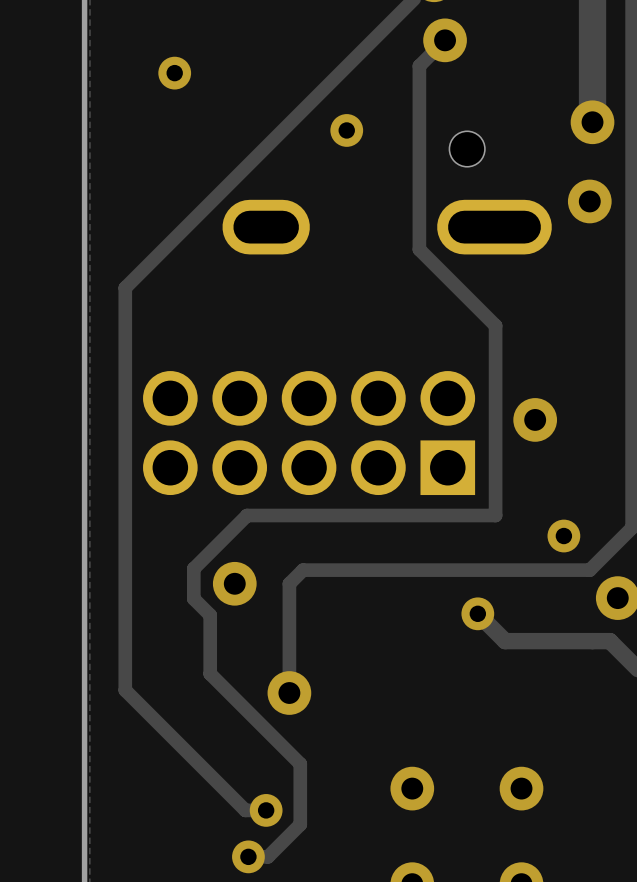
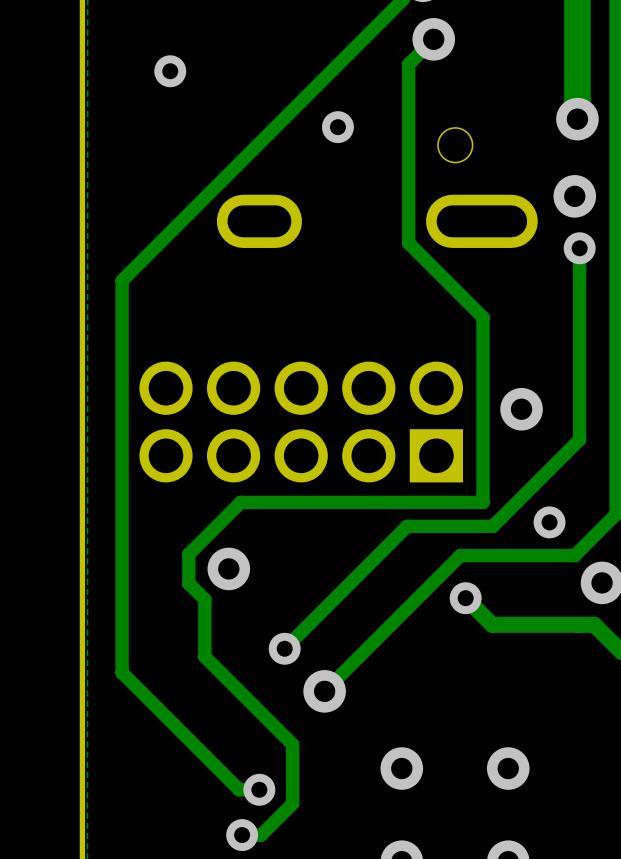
track: none -> (579, 248) (579, 439) (492, 526) (407, 526) (284, 648)
via: none -> (579, 248)
track: (472, 570) (303, 570) (289, 583) (289, 693) -> (460, 555) (324, 691)
via: none -> (284, 648)
via position: (289, 693) -> (324, 691)

